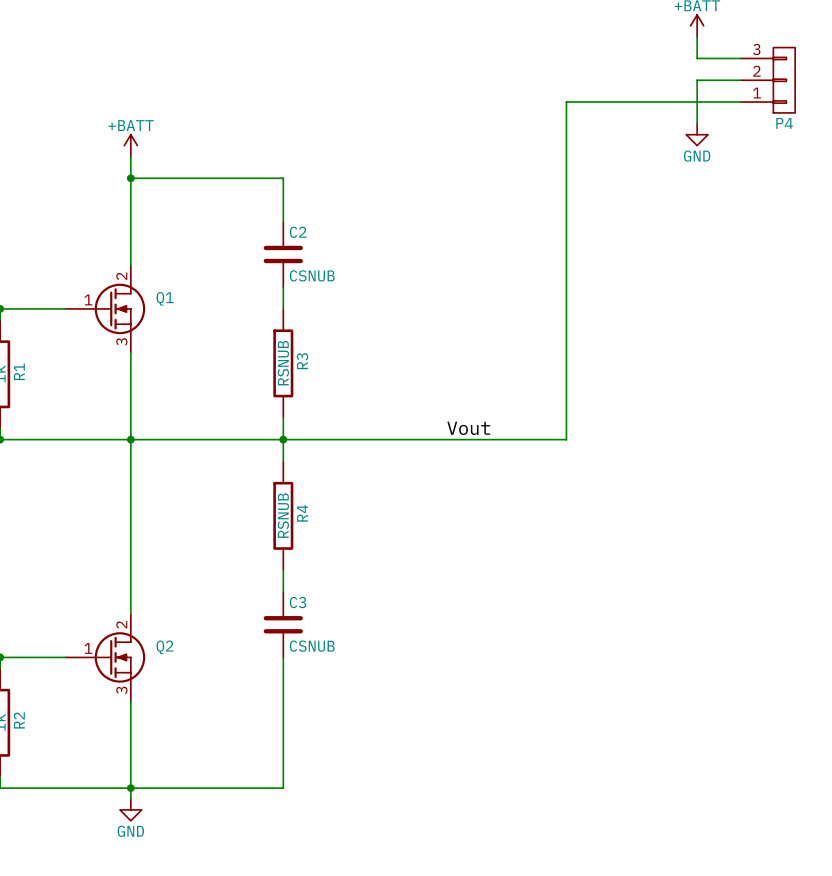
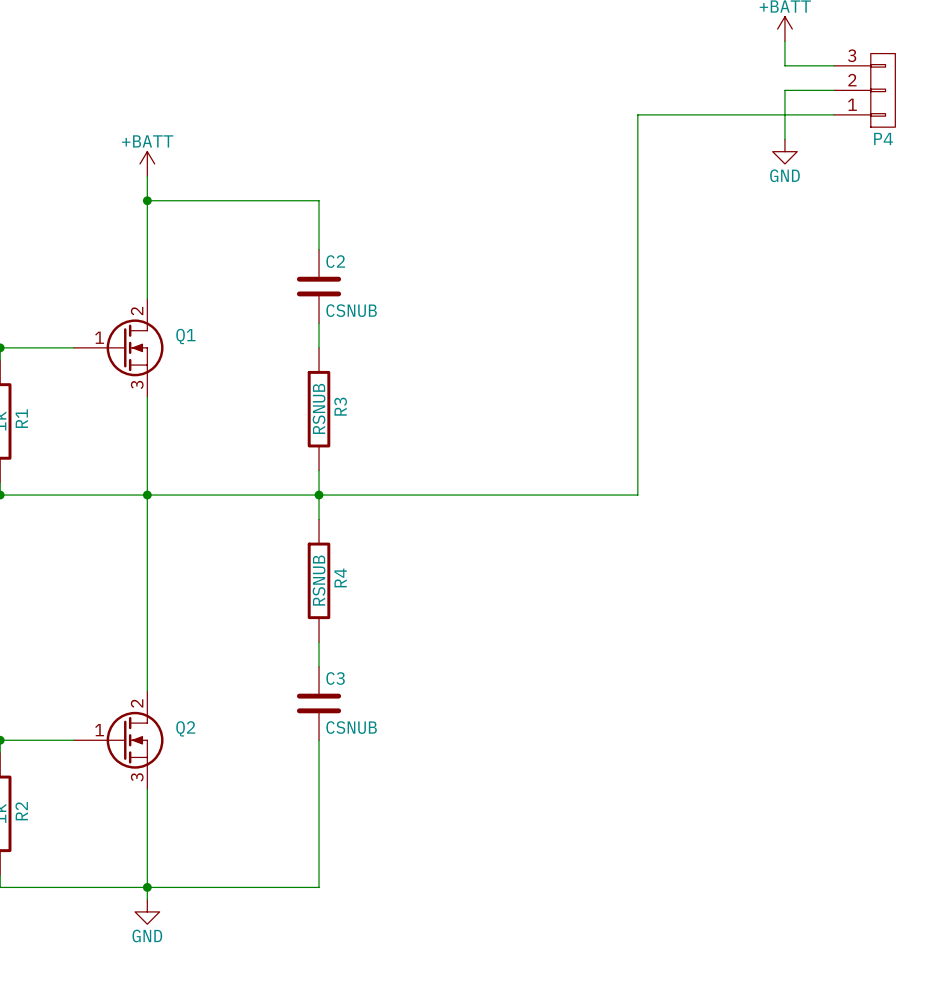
label: Vout (468, 428) -> none

